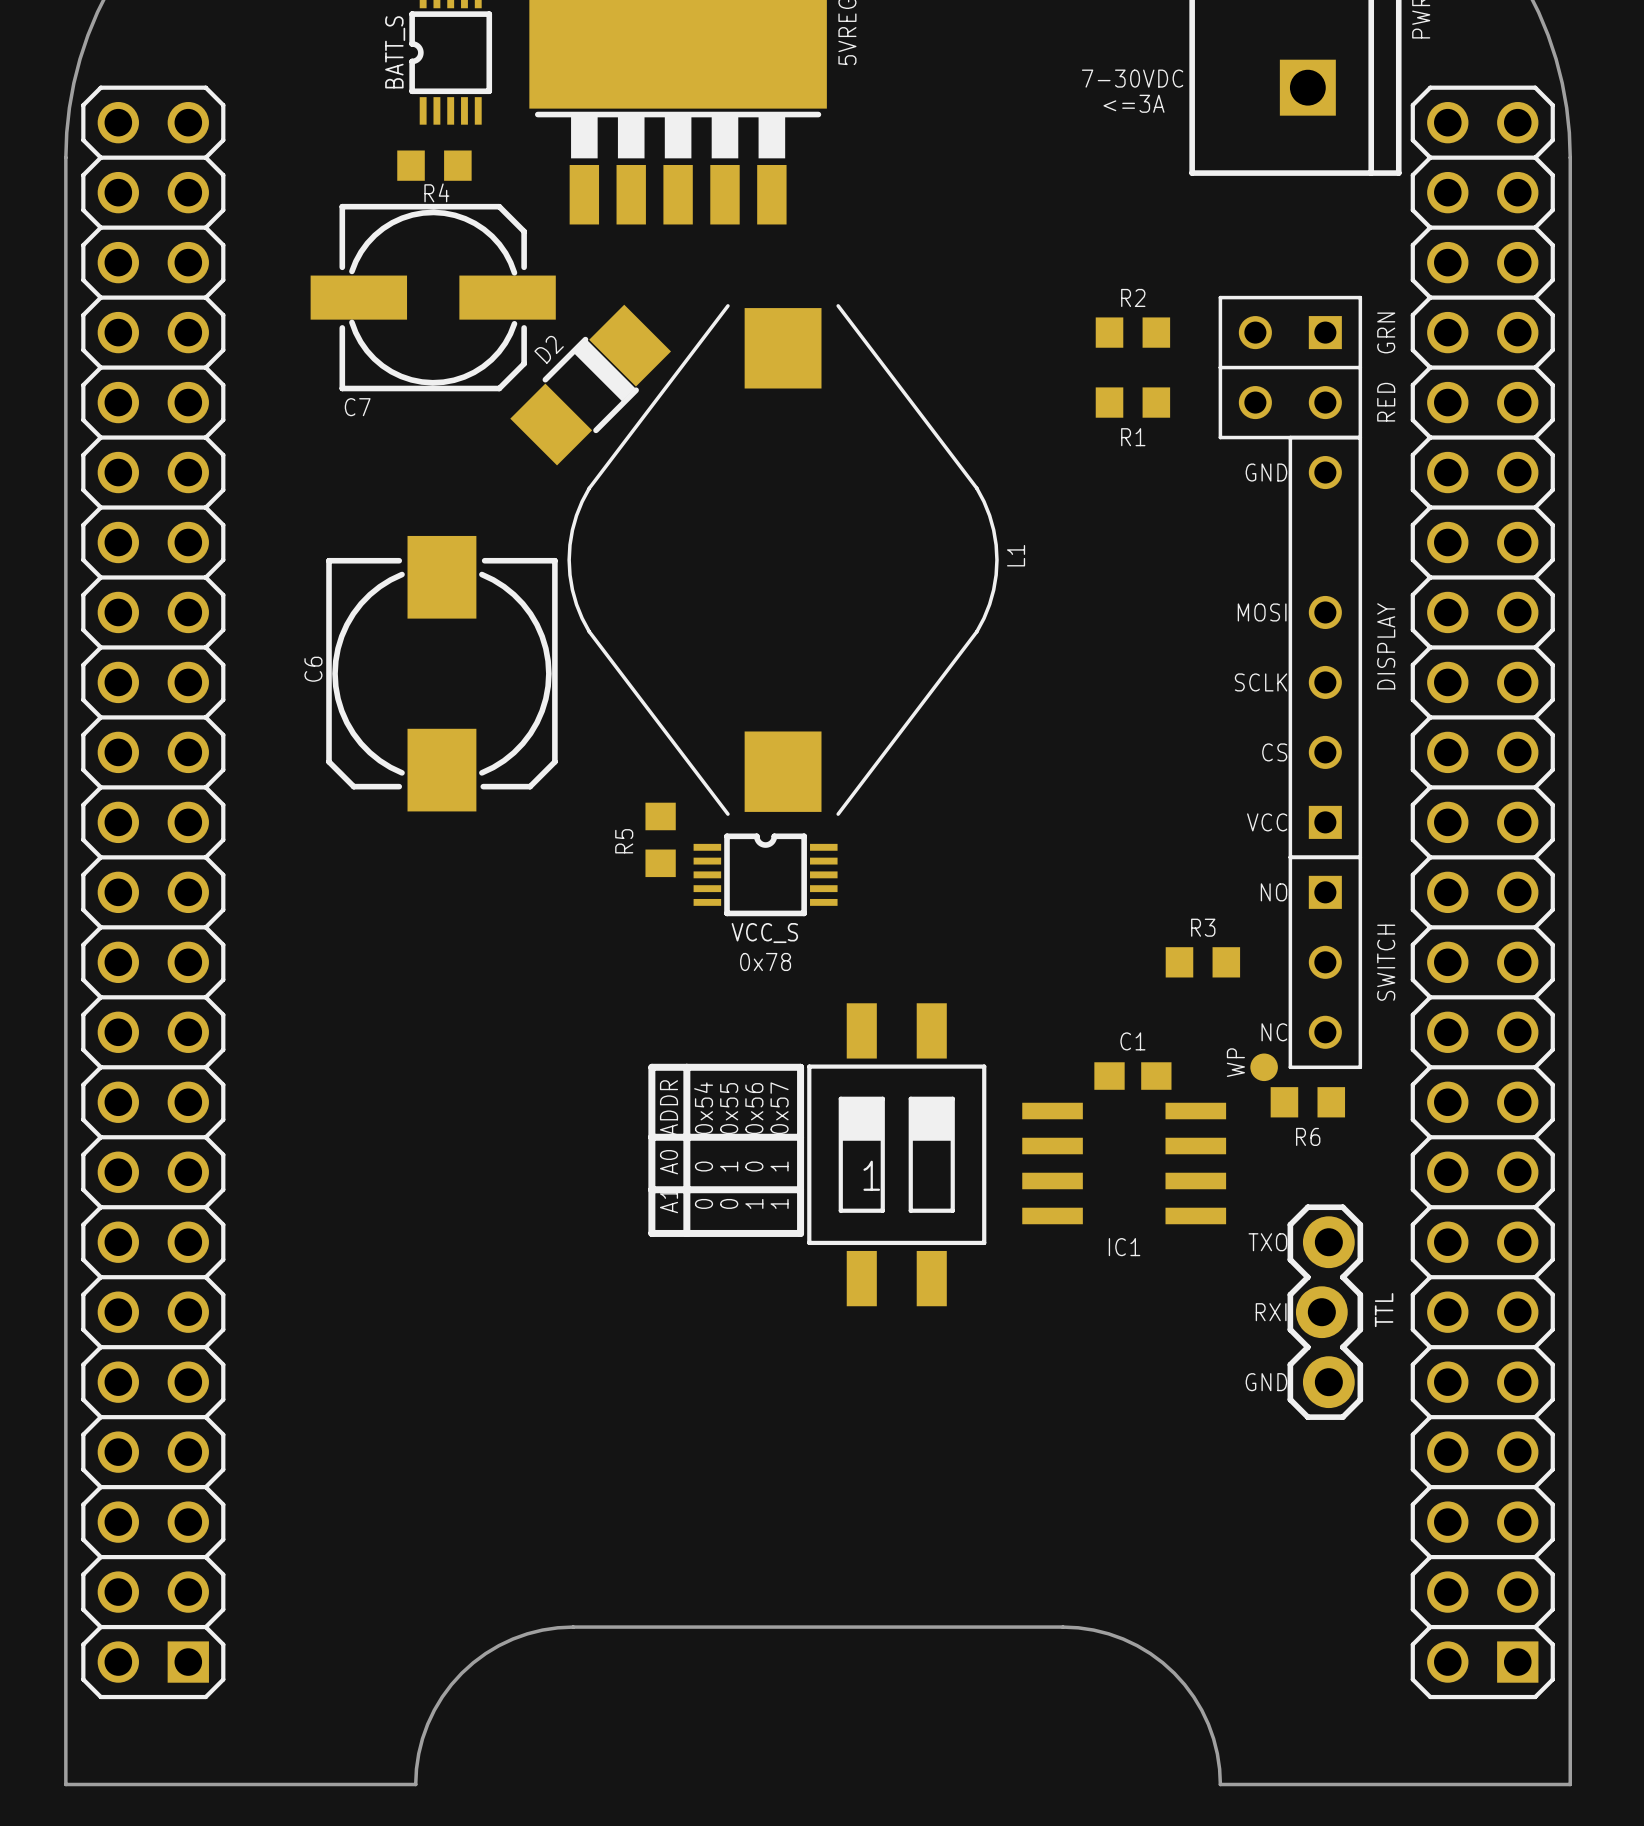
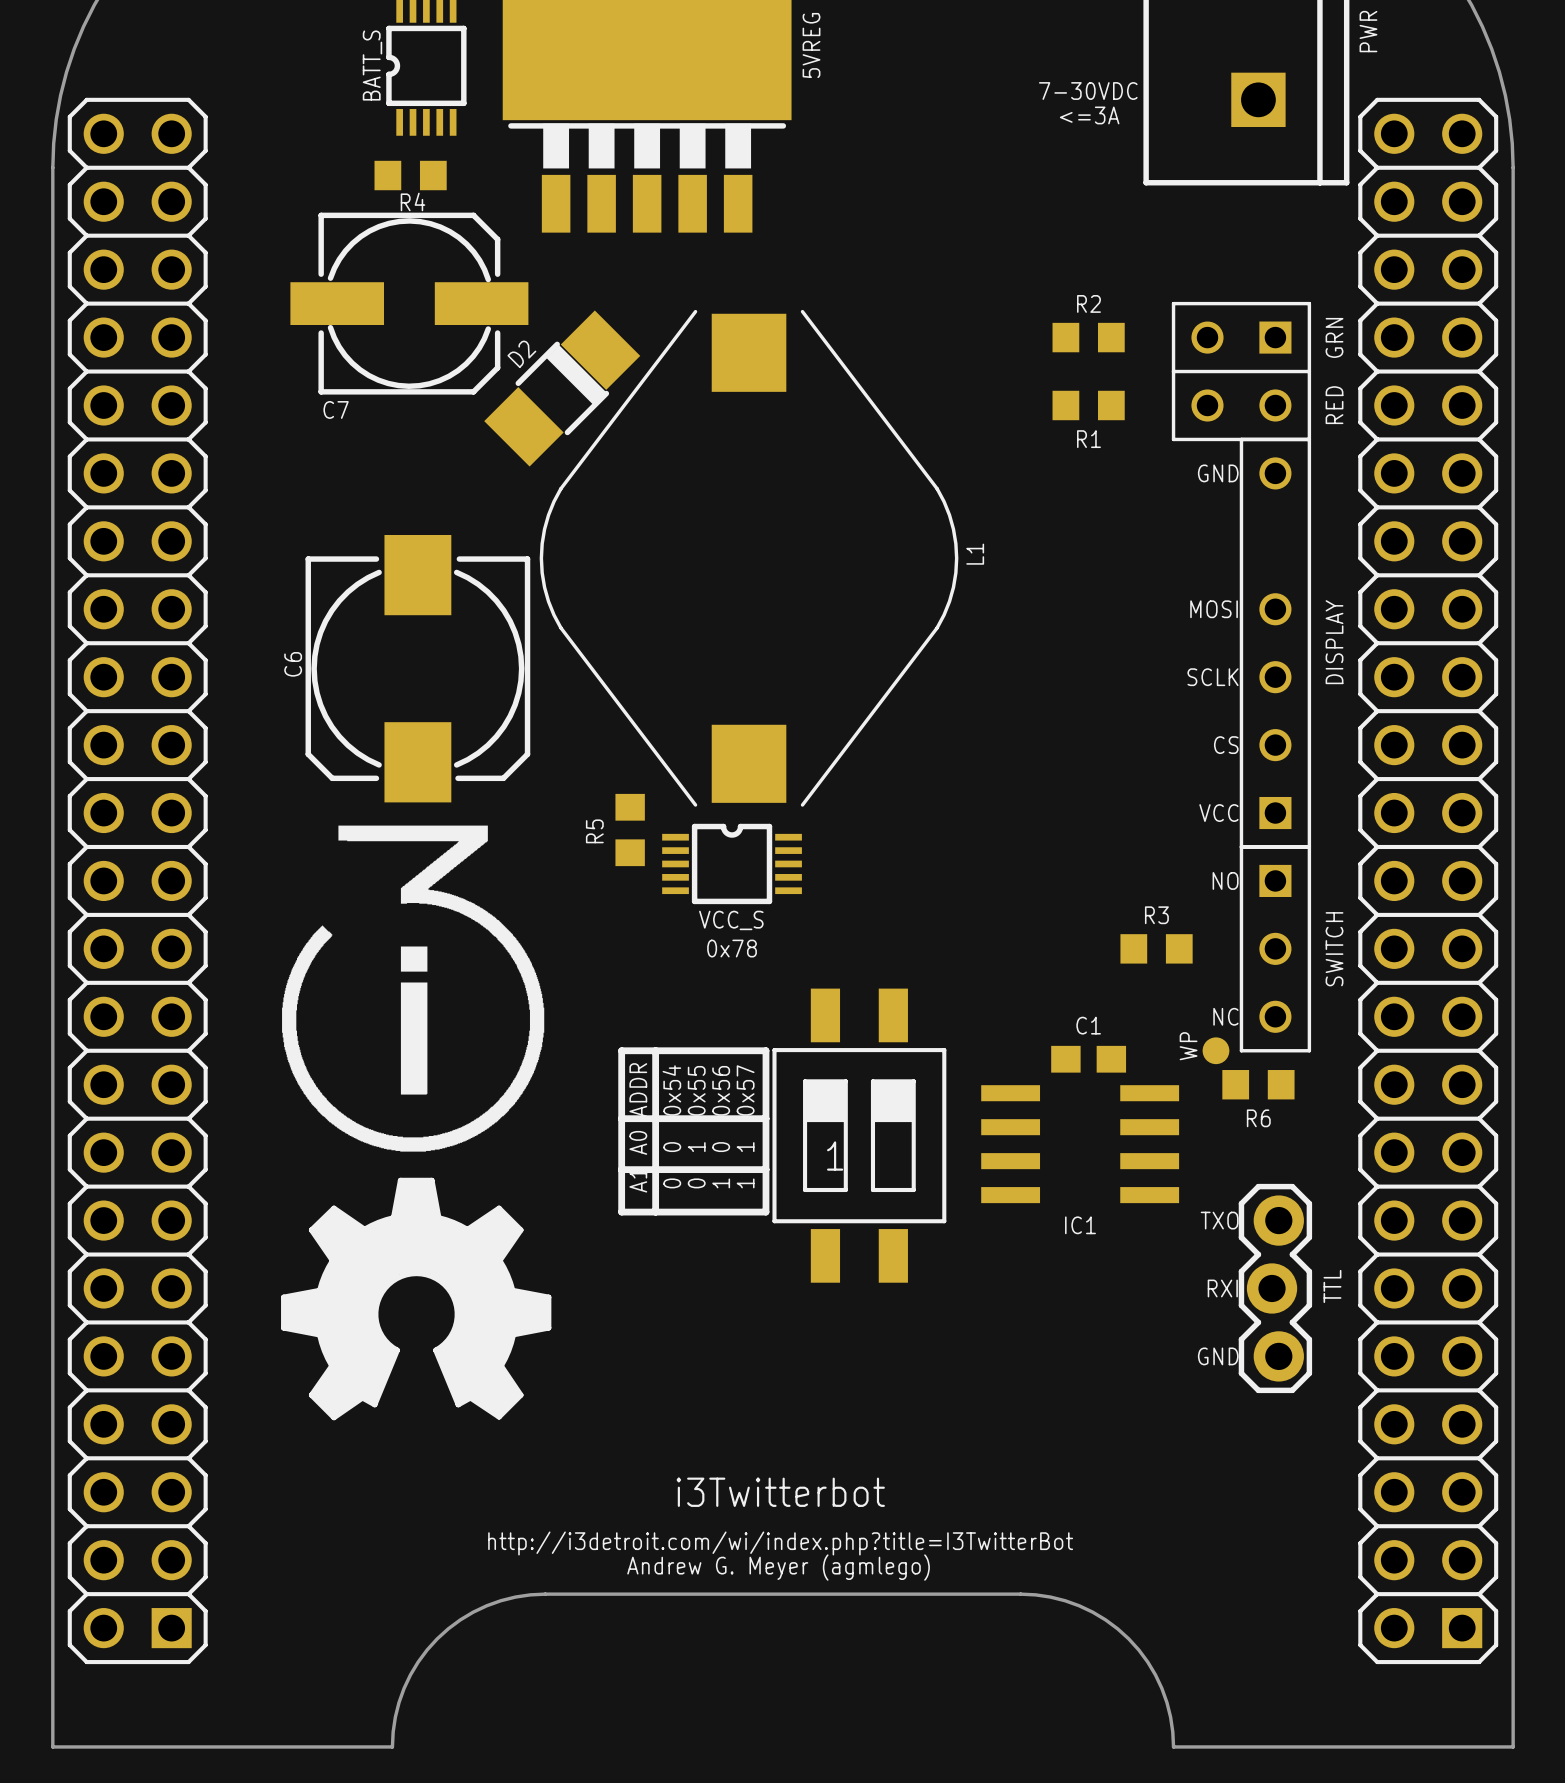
drawing: none -> [281, 825, 552, 1421]
drawing: none -> [400, 946, 428, 1095]
text: none -> i3Twitterbot (780, 1492)
text: none -> http://i3detroit.com/wi/index.php?title=I3TwitterBot (780, 1543)
text: none -> Andrew G. Meyer (agmlego) (778, 1567)

